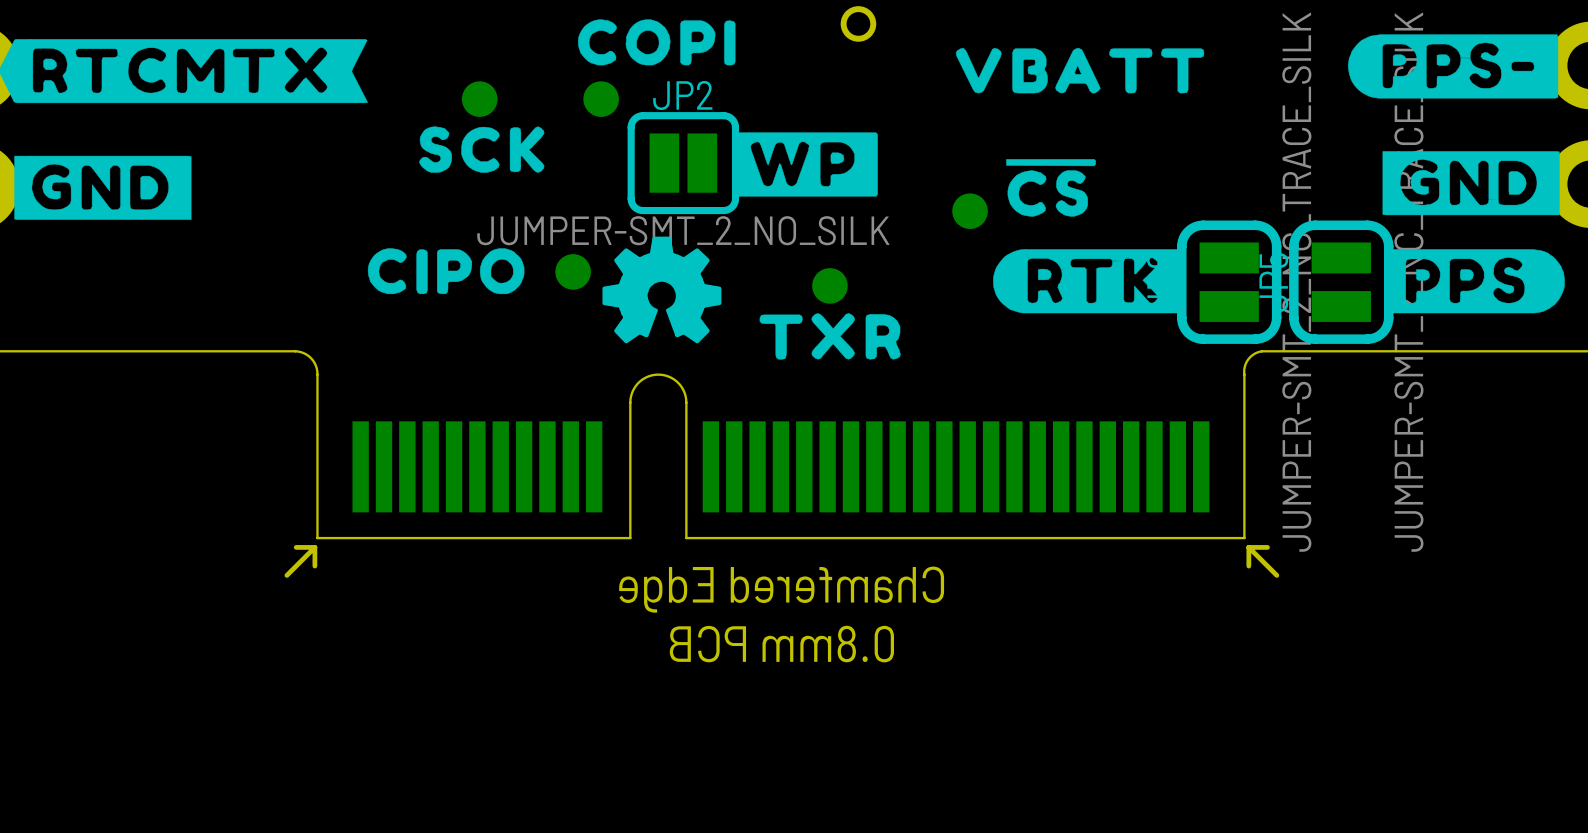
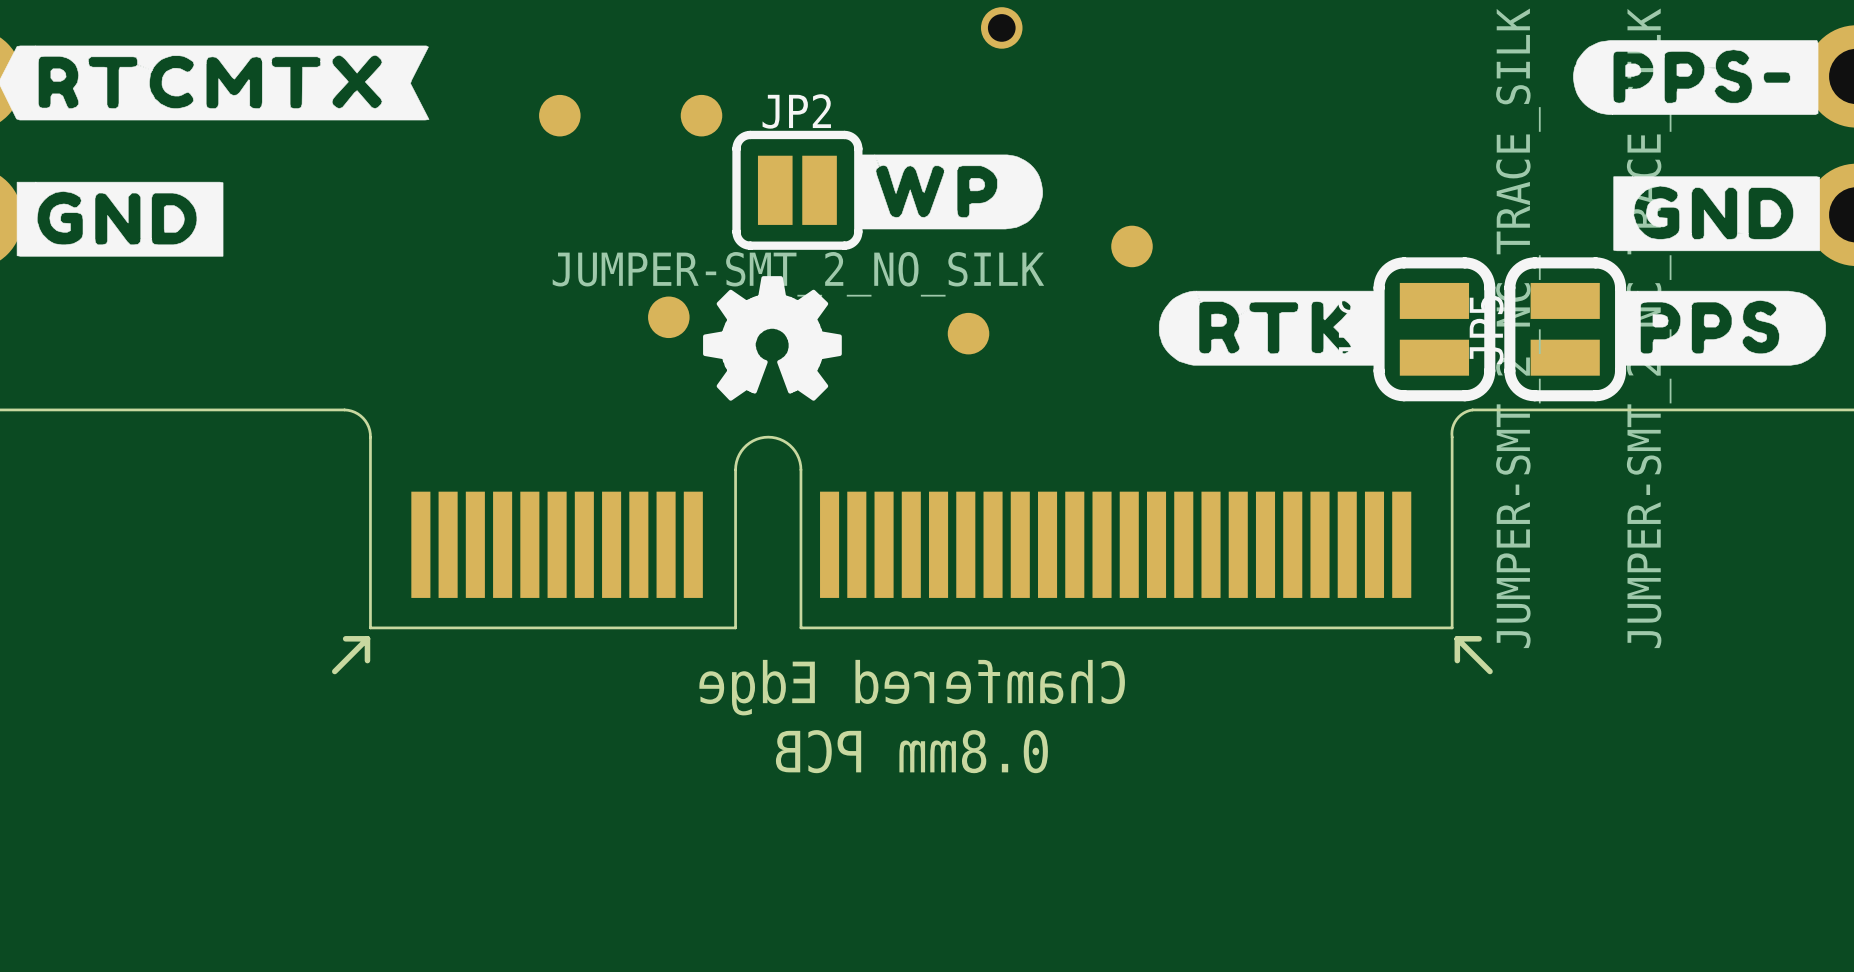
drawing: [578, 19, 736, 66] -> none
drawing: [955, 47, 1205, 94] -> none
drawing: [419, 126, 545, 173] -> none
drawing shape: [733, 132, 878, 197] -> [855, 154, 1043, 230]
drawing: [1006, 159, 1096, 217] -> none
drawing: [367, 248, 525, 295] -> none
drawing: [759, 313, 901, 360] -> none

